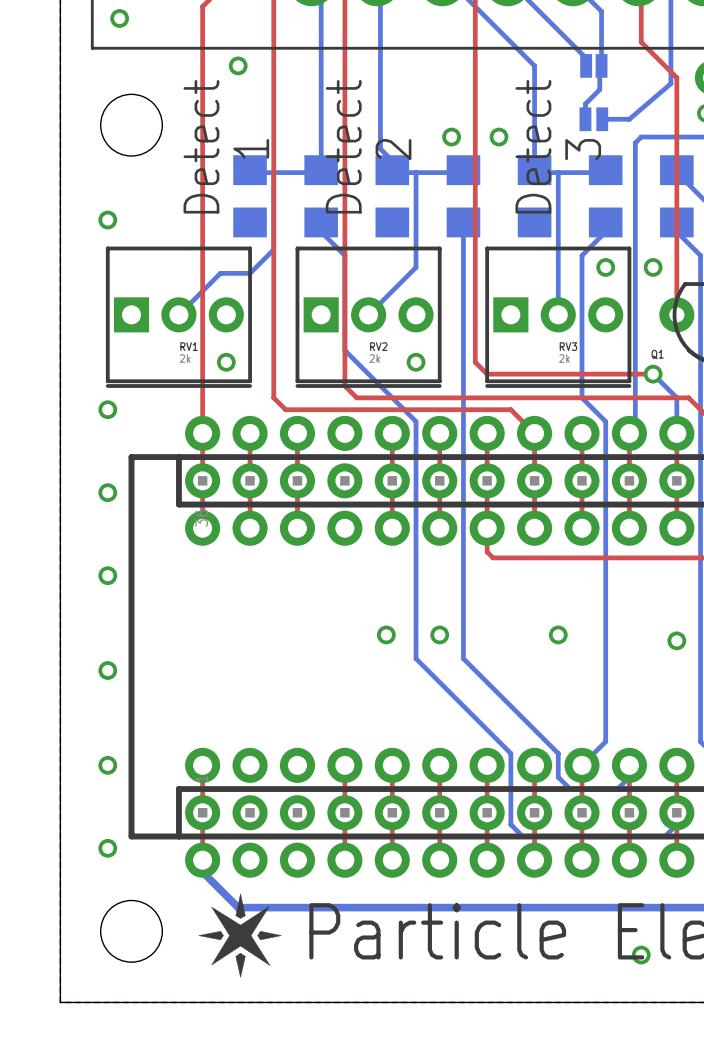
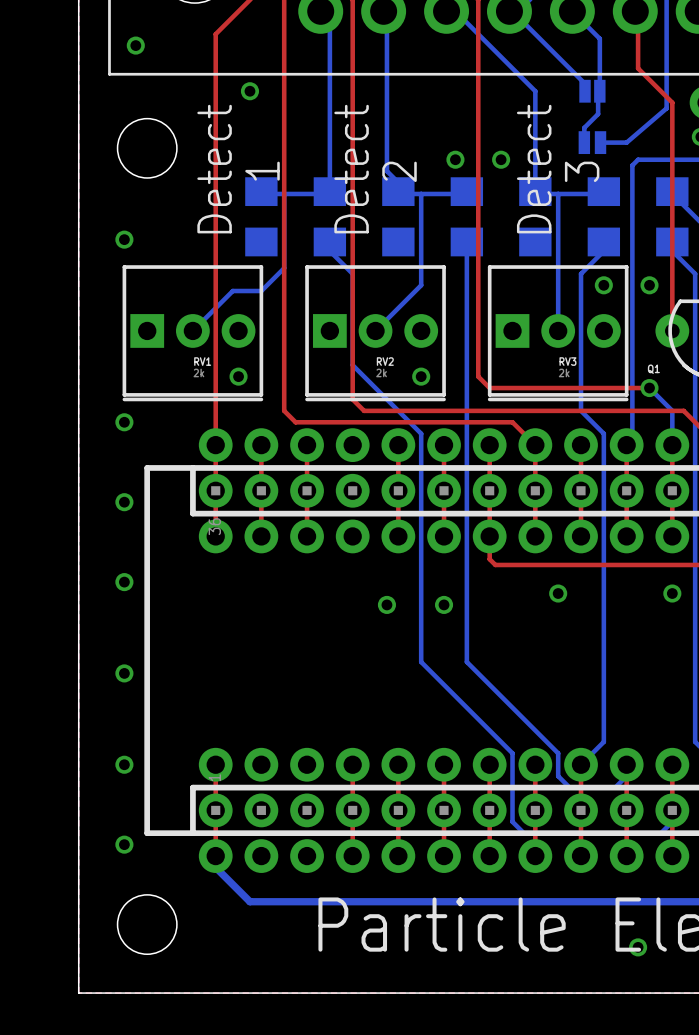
via: none -> (672, 593)
via: none -> (386, 604)
via: none -> (444, 604)
via: (386, 634) -> none
via: (439, 634) -> none
via position: (558, 634) -> (558, 593)
via: (676, 640) -> none
drawing: [198, 893, 282, 978] -> none

